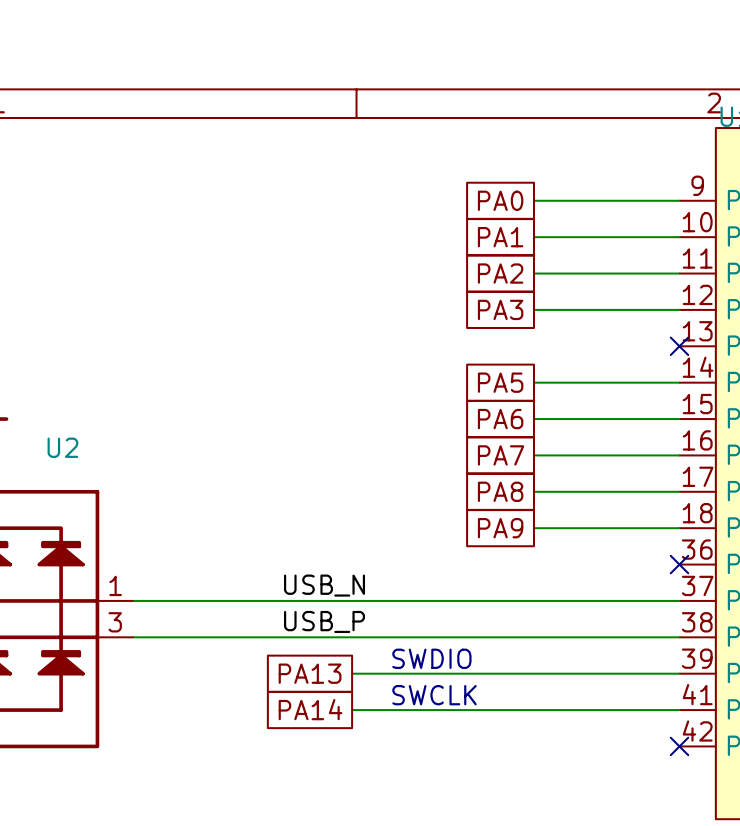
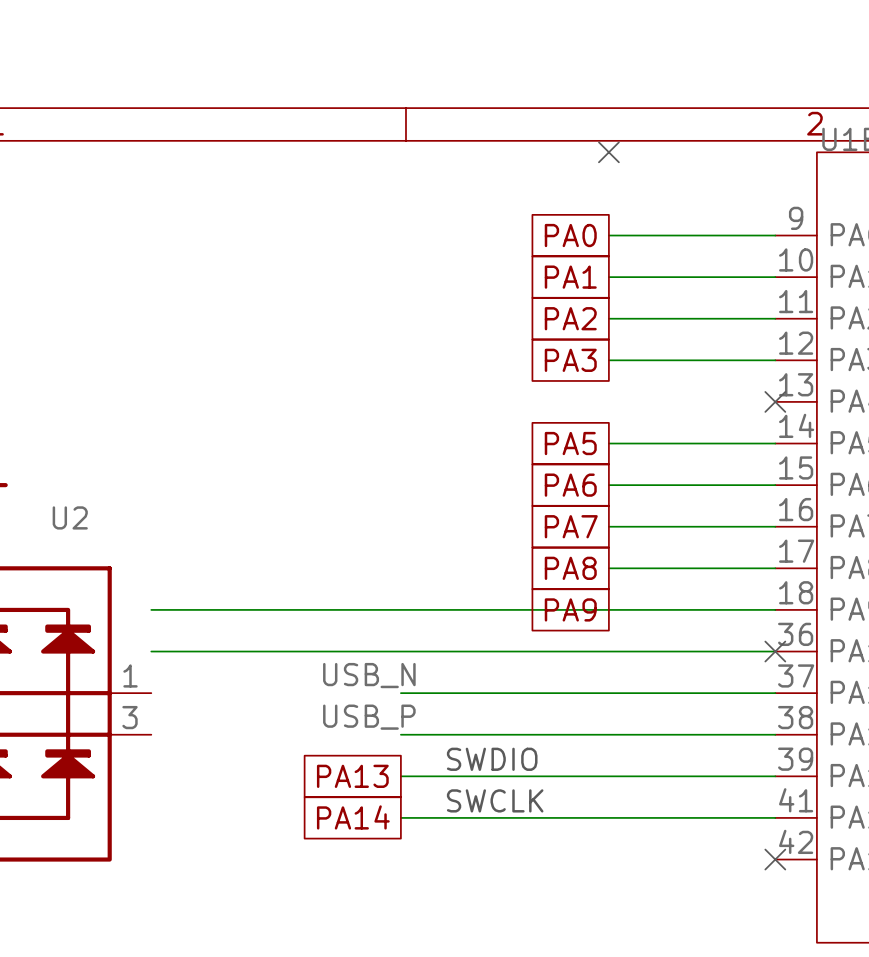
no-connect mark: none -> (608, 152)
wire: none -> (151, 609) (608, 609)
wire: none -> (151, 651) (775, 651)
wire: (133, 600) (352, 600) -> none
wire: (133, 637) (352, 637) -> none

